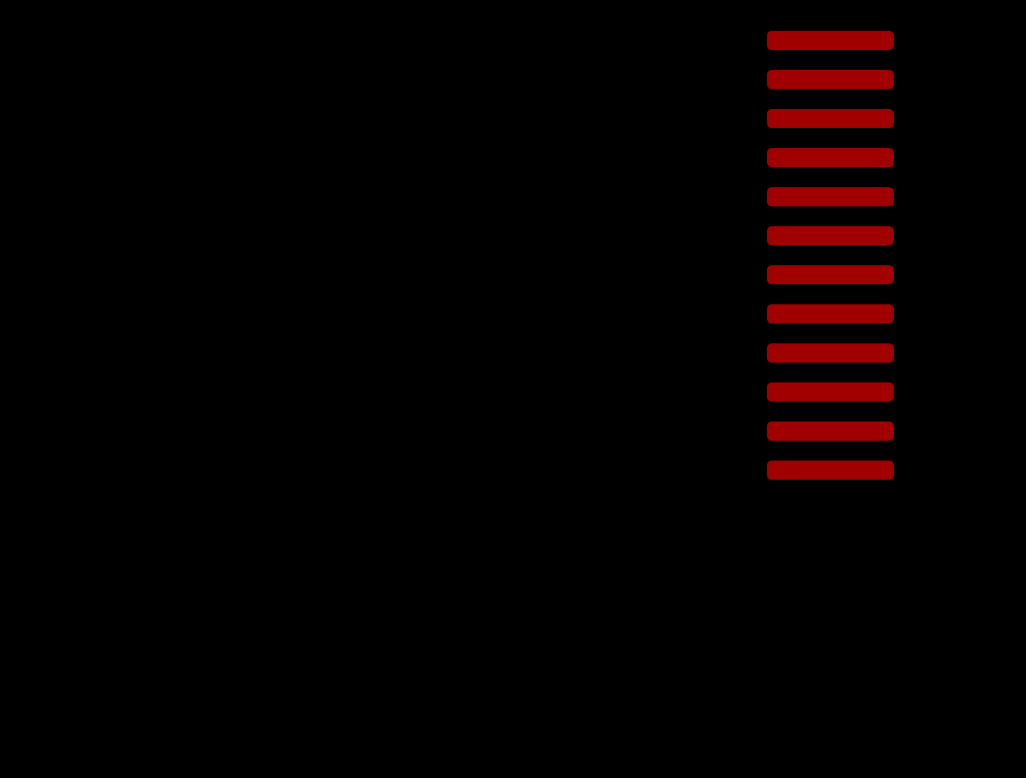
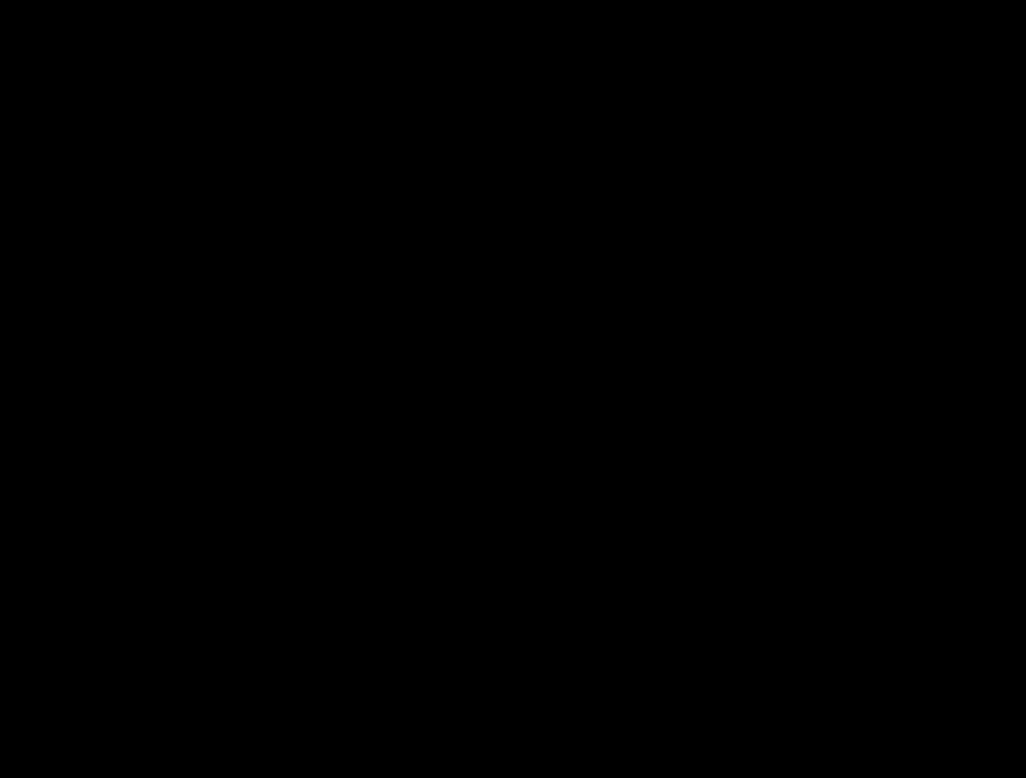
part: (830, 255) -> none

